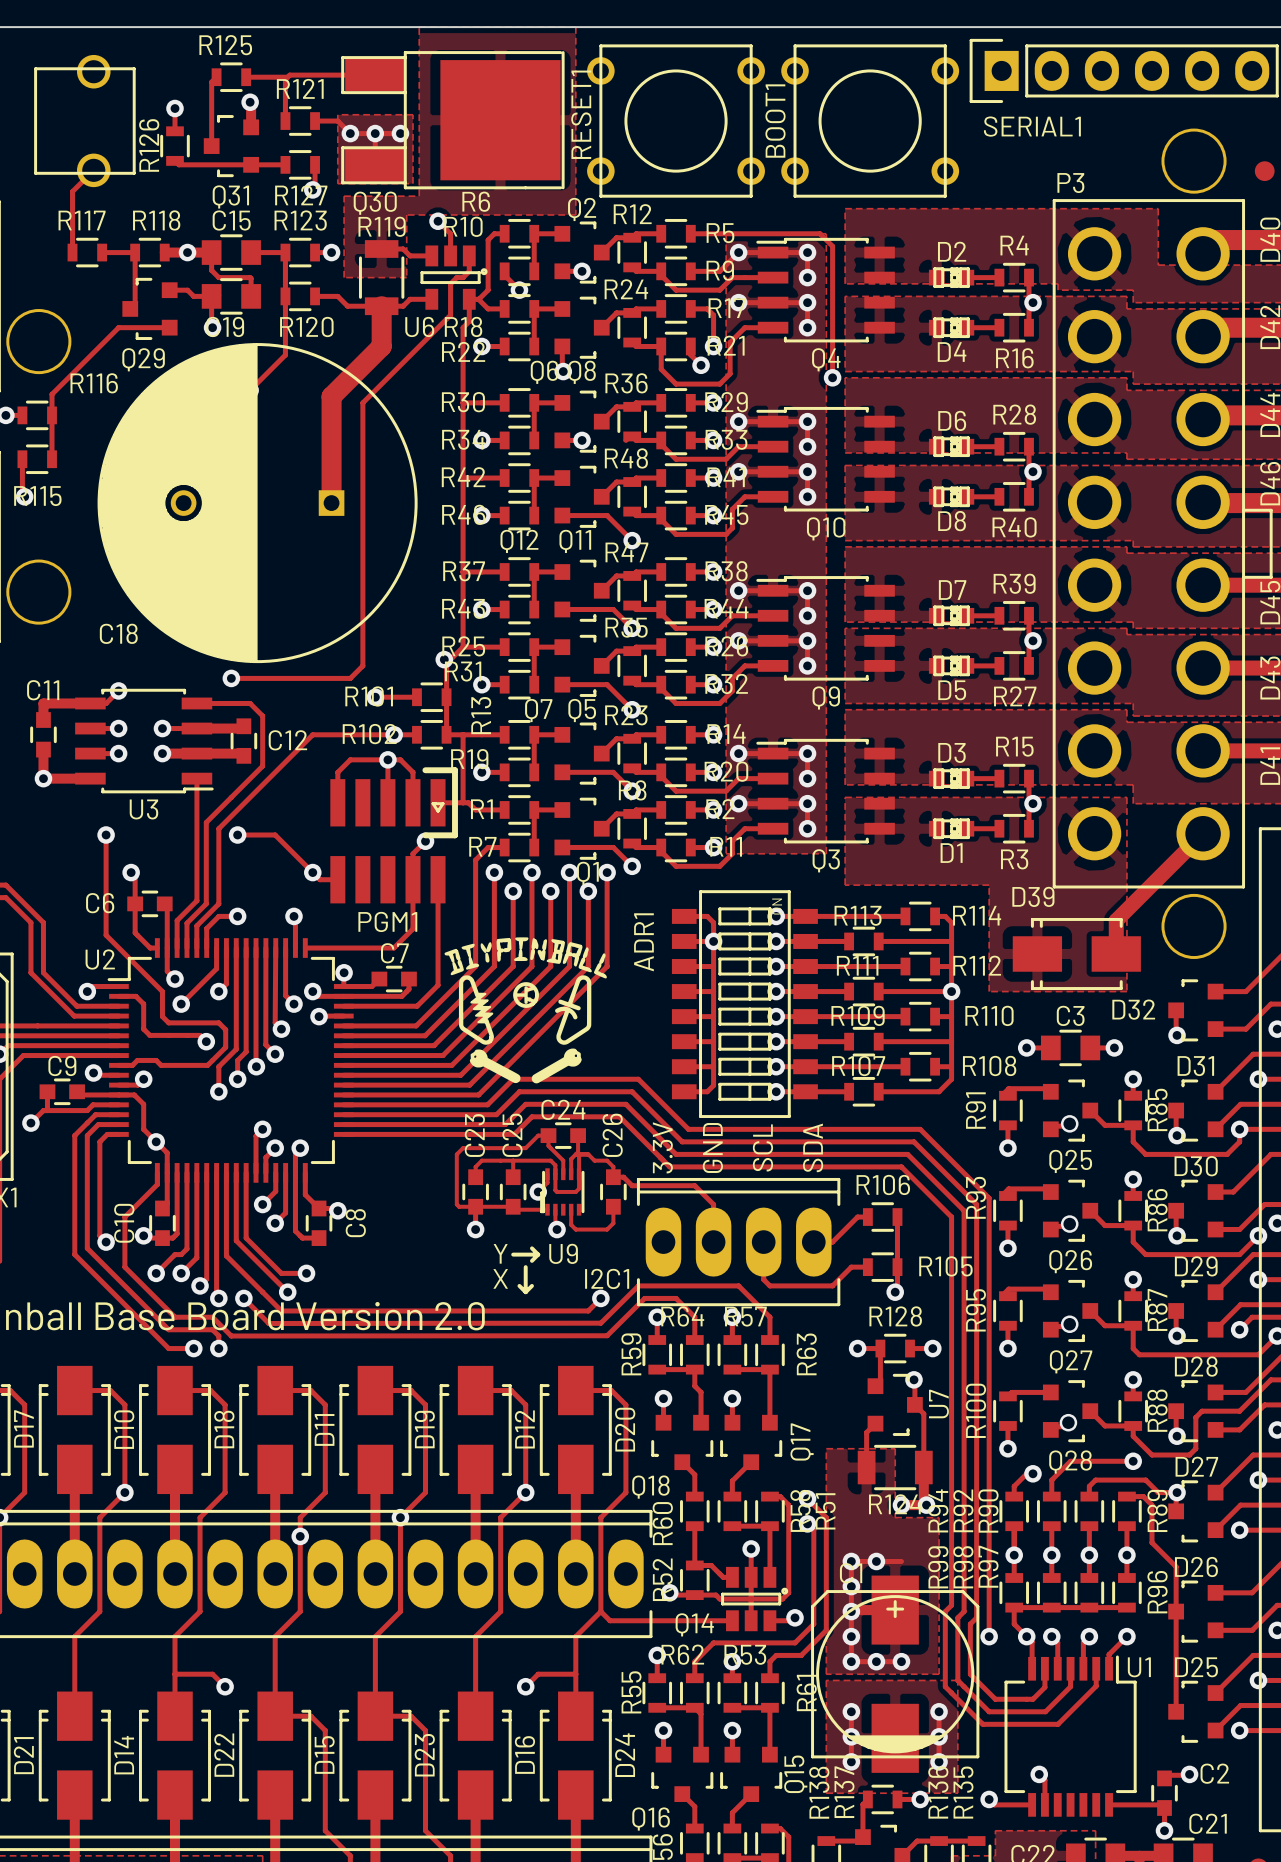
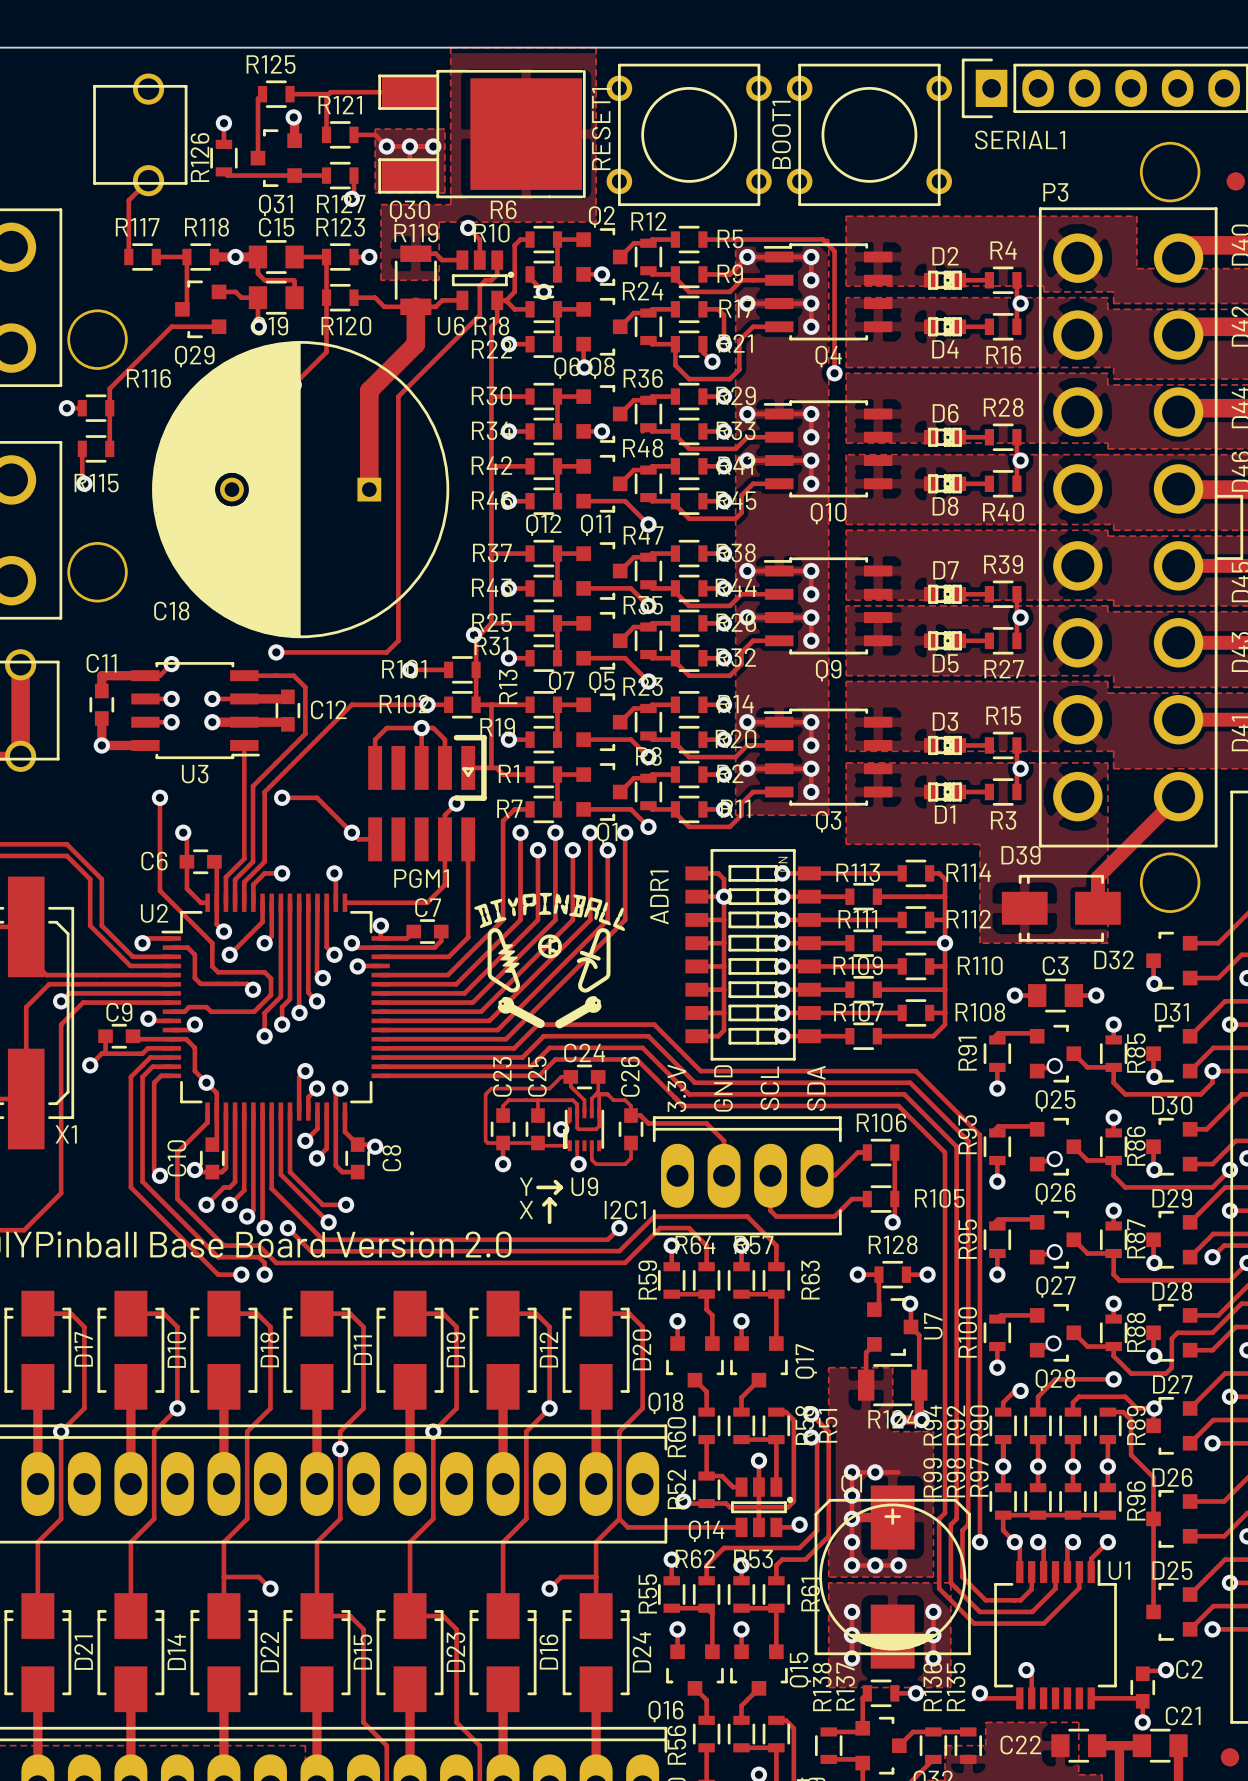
line: none -> (543, 1204) (549, 1199) (555, 1204)
line: (519, 1285) (525, 1292) (531, 1285) -> none

